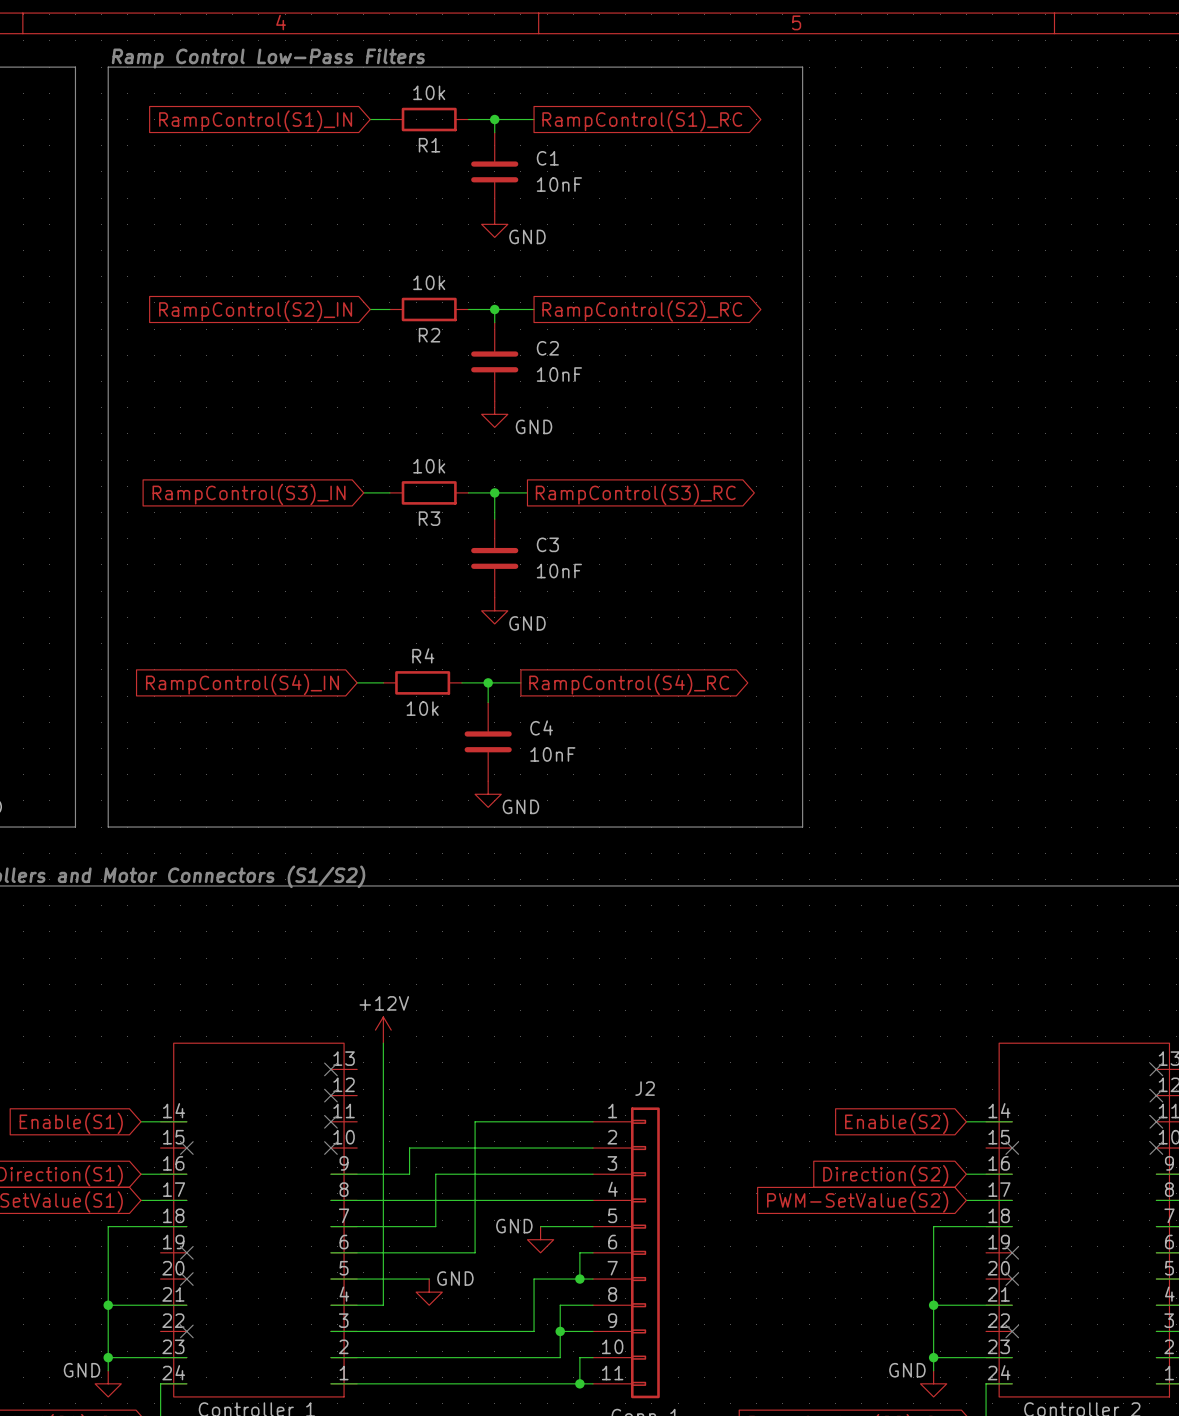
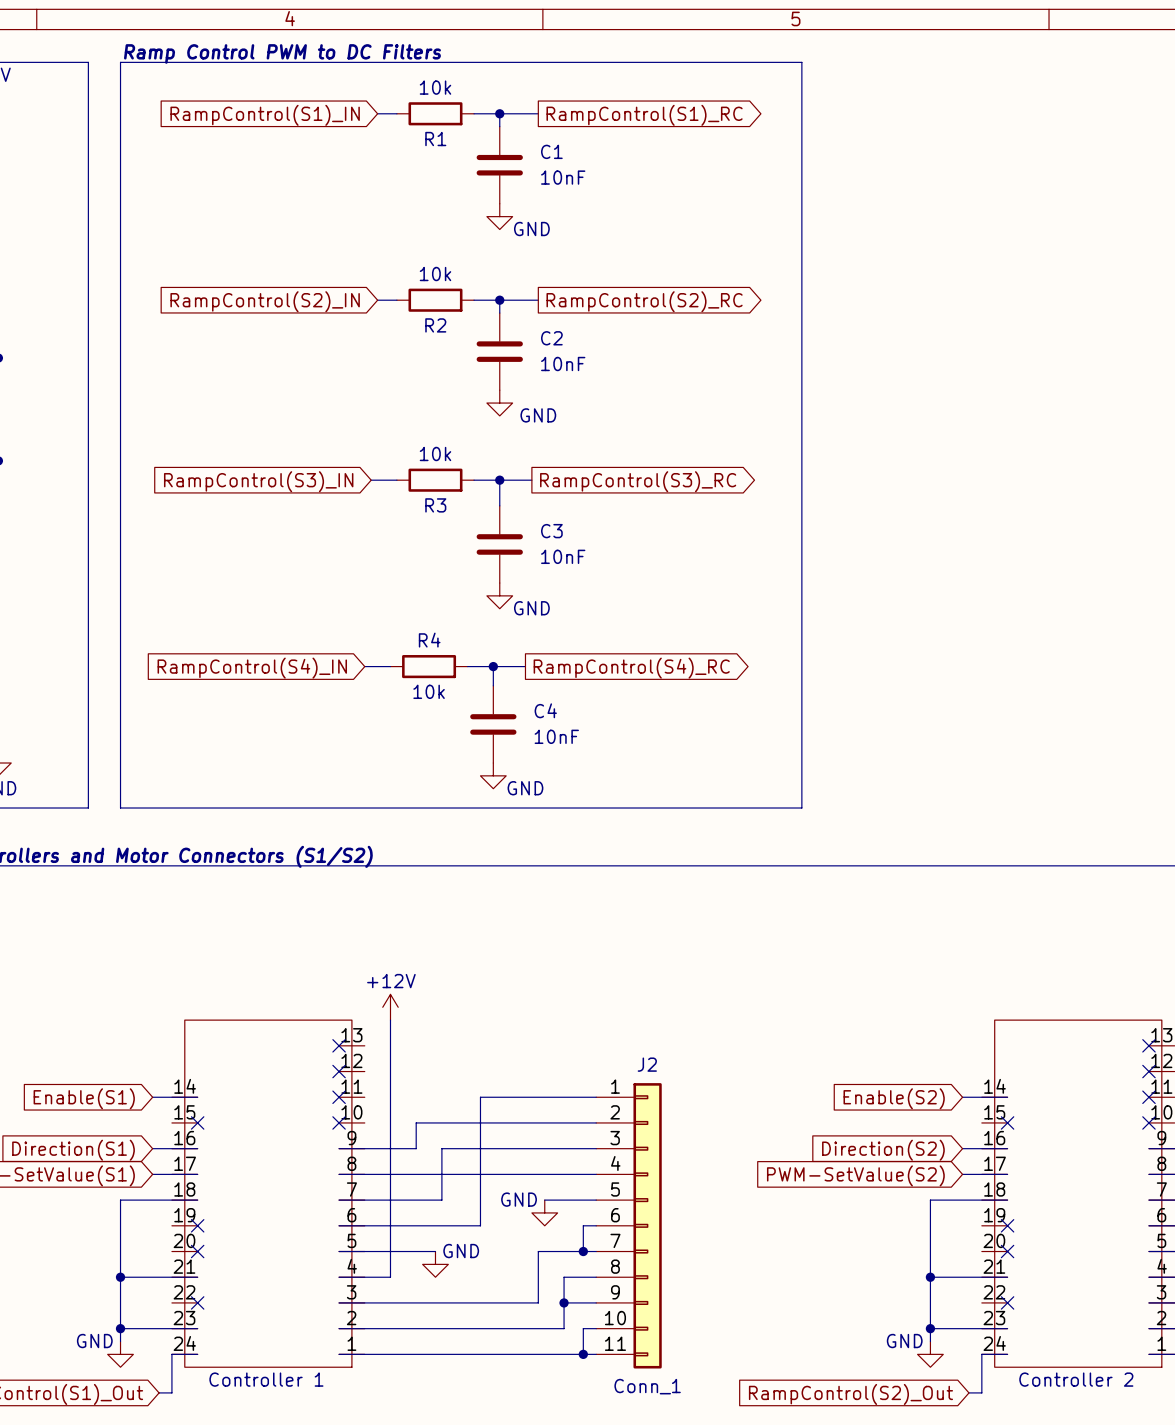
text: Ramp Control Low-Pass Filters (268, 58) -> Ramp Control PWM to DC Filters (282, 53)

